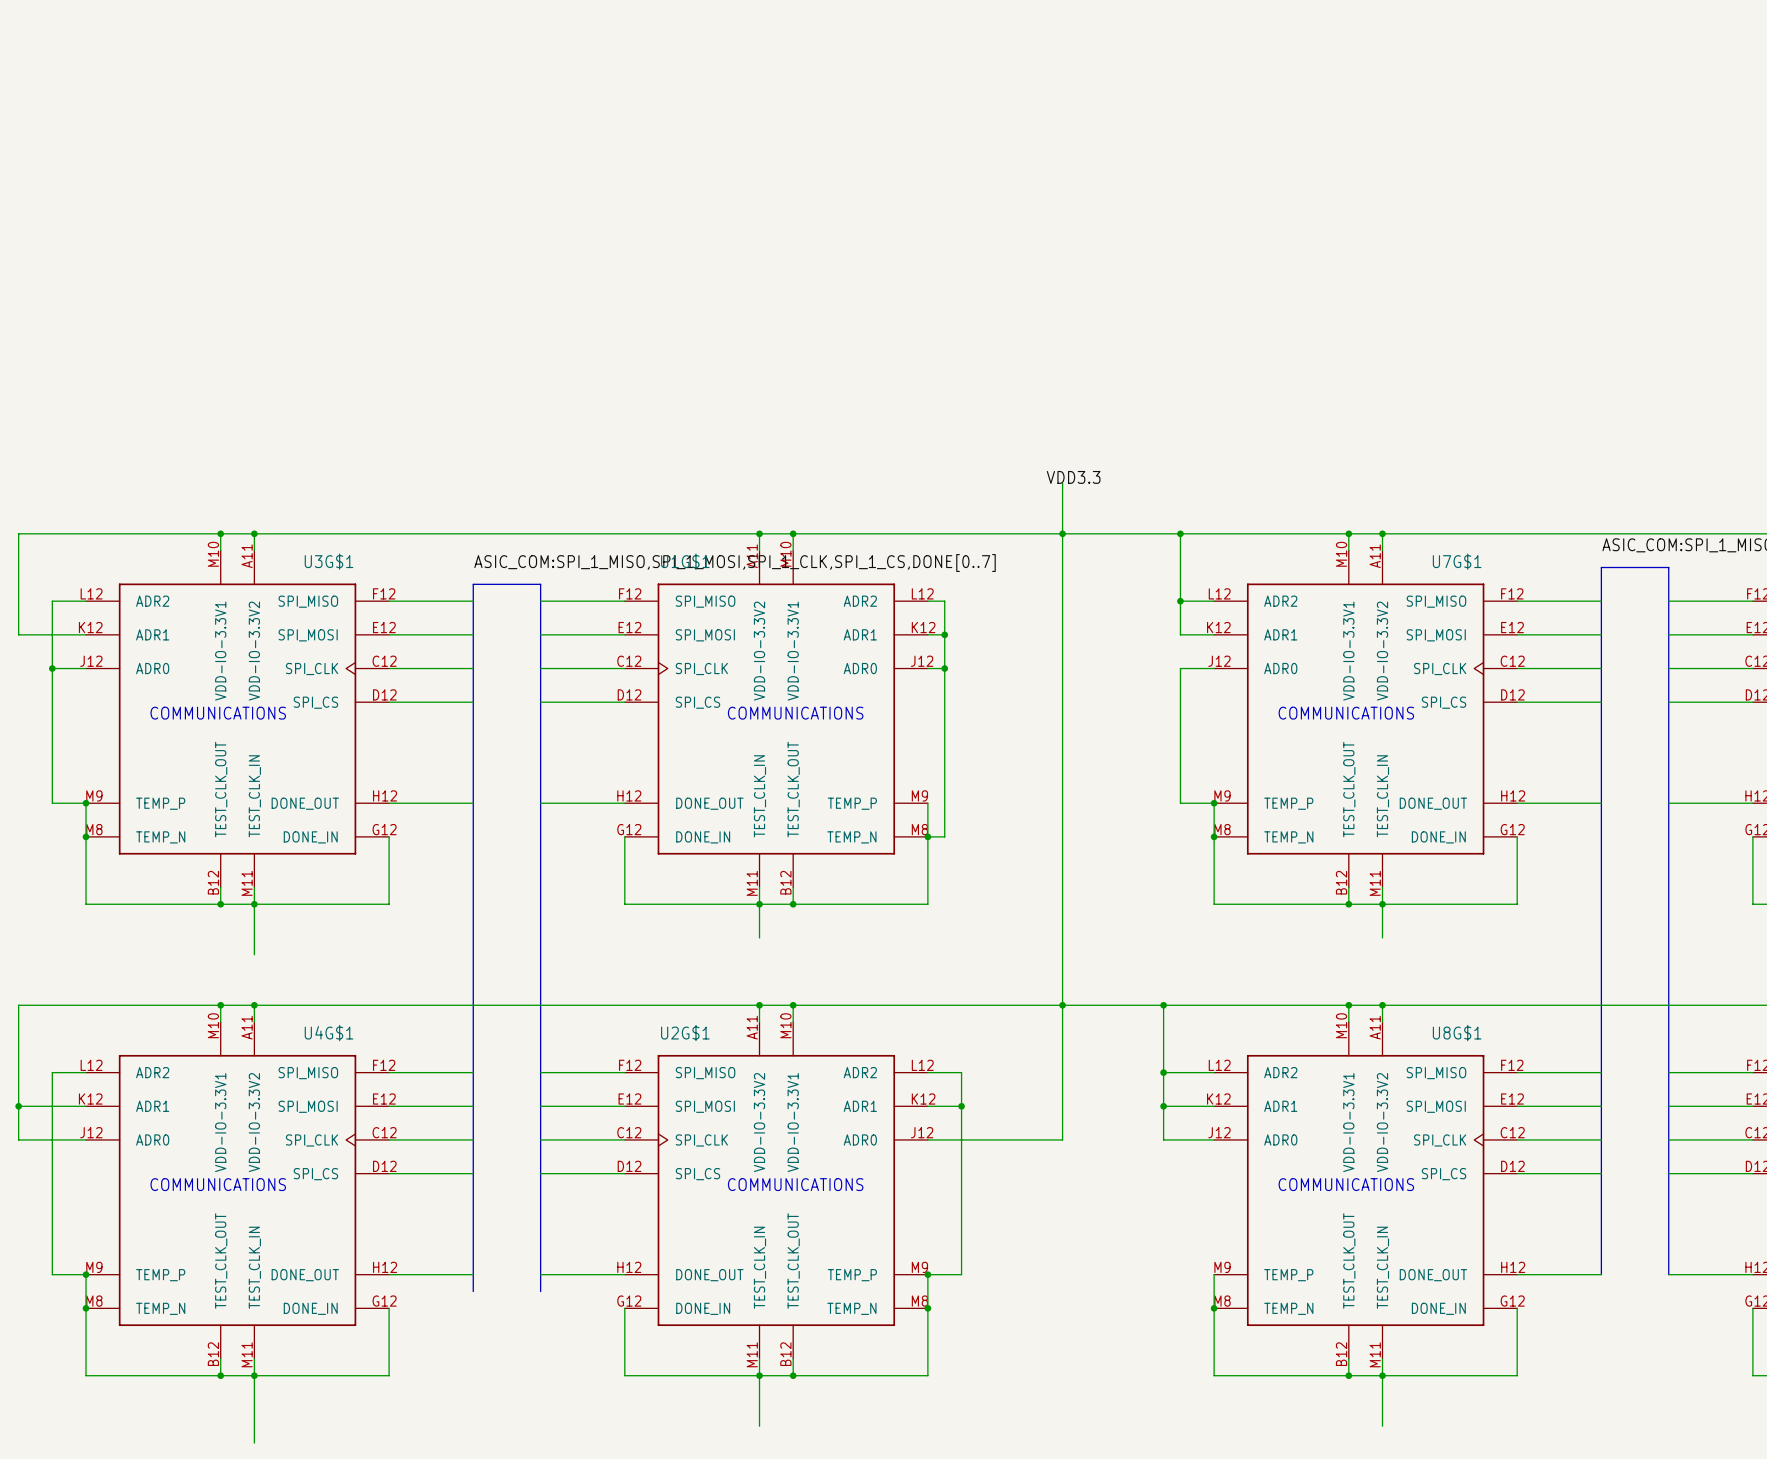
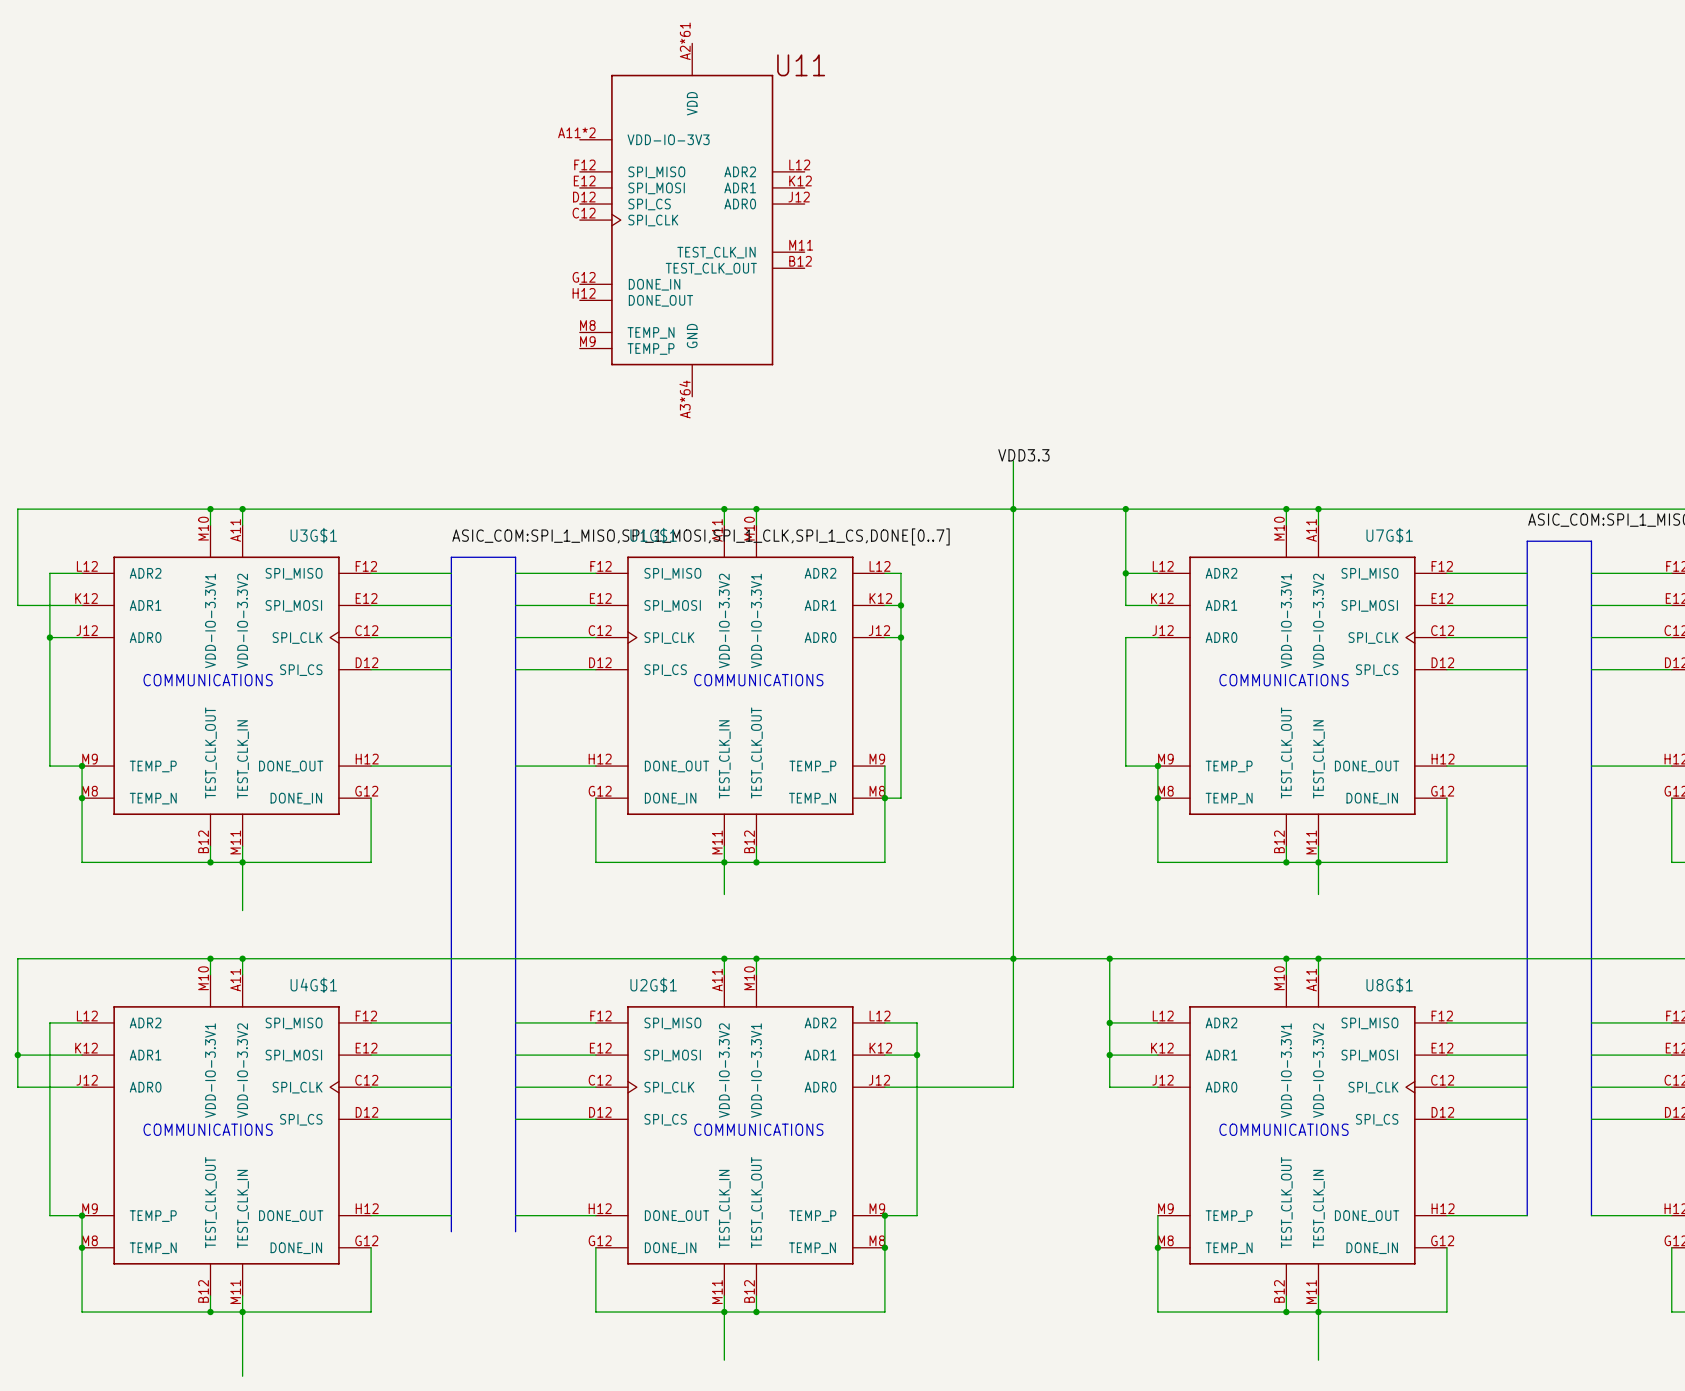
U11: none -> (692, 220)

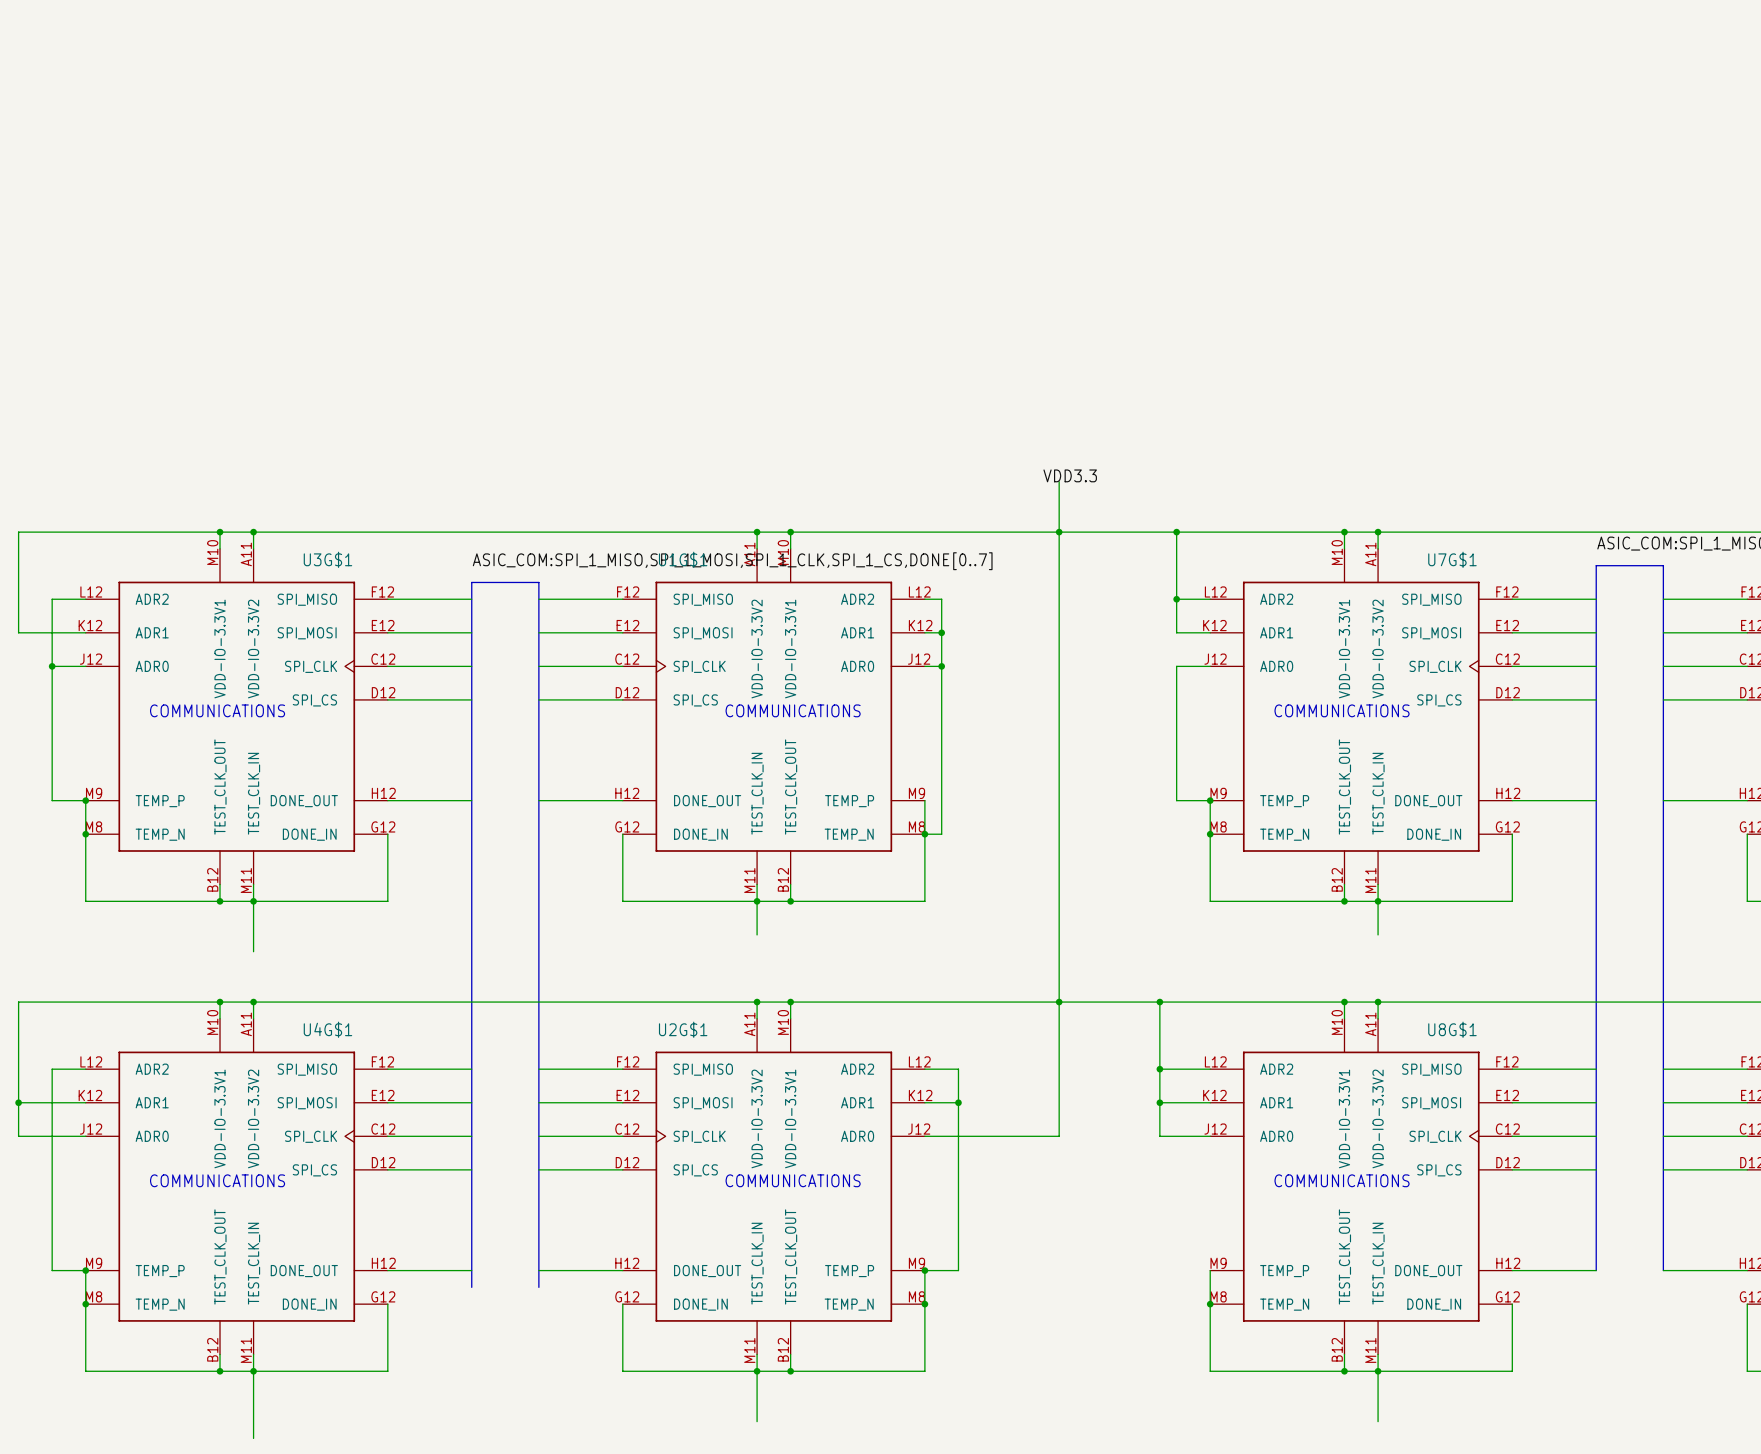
U11: (692, 220) -> none

